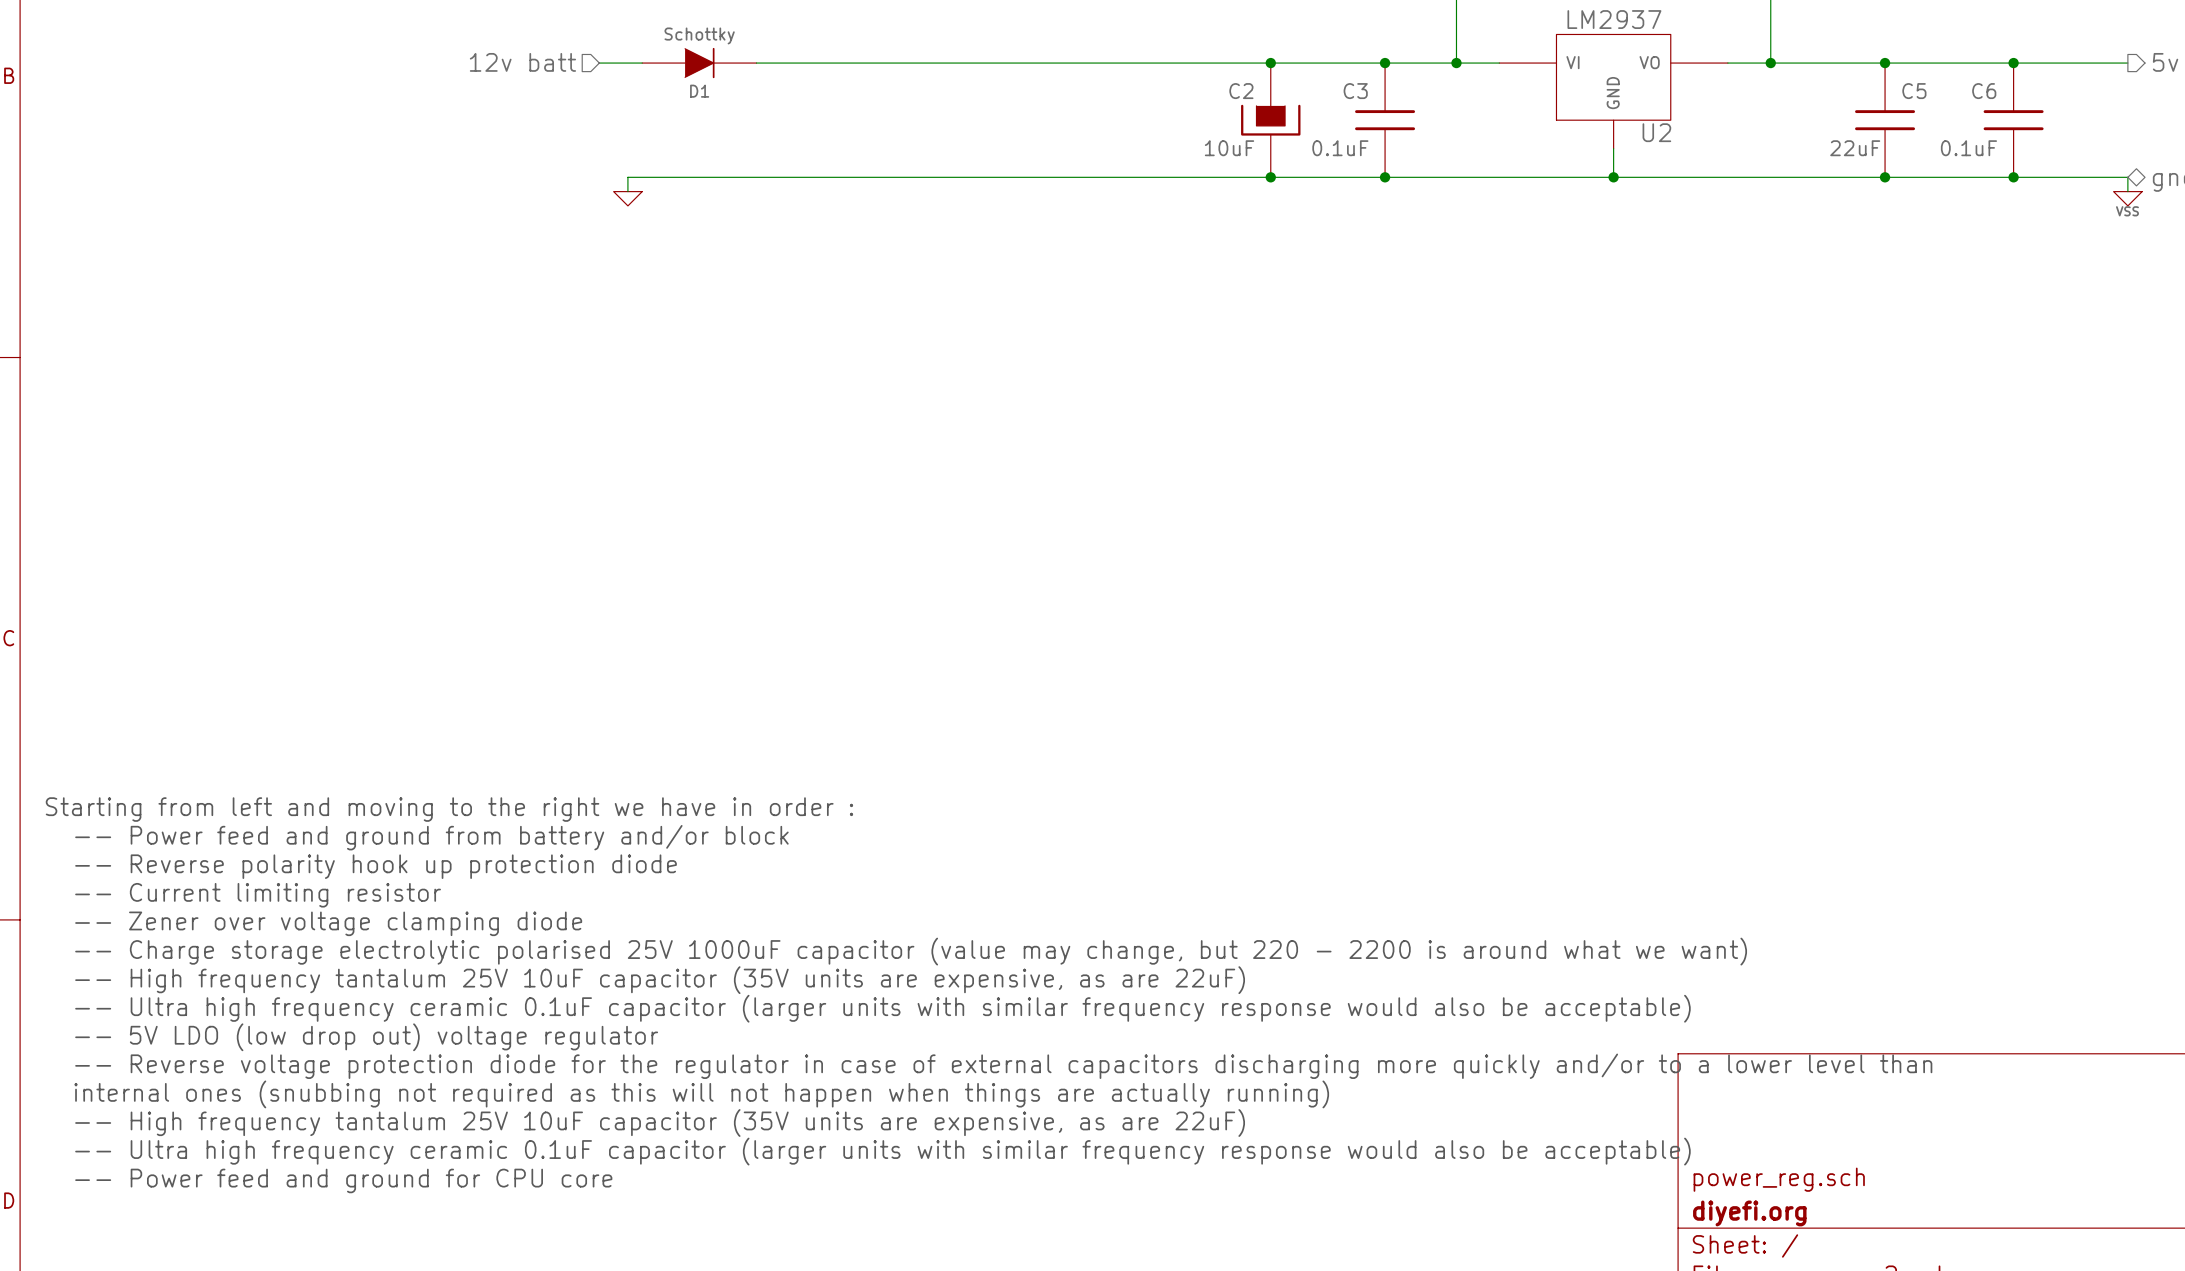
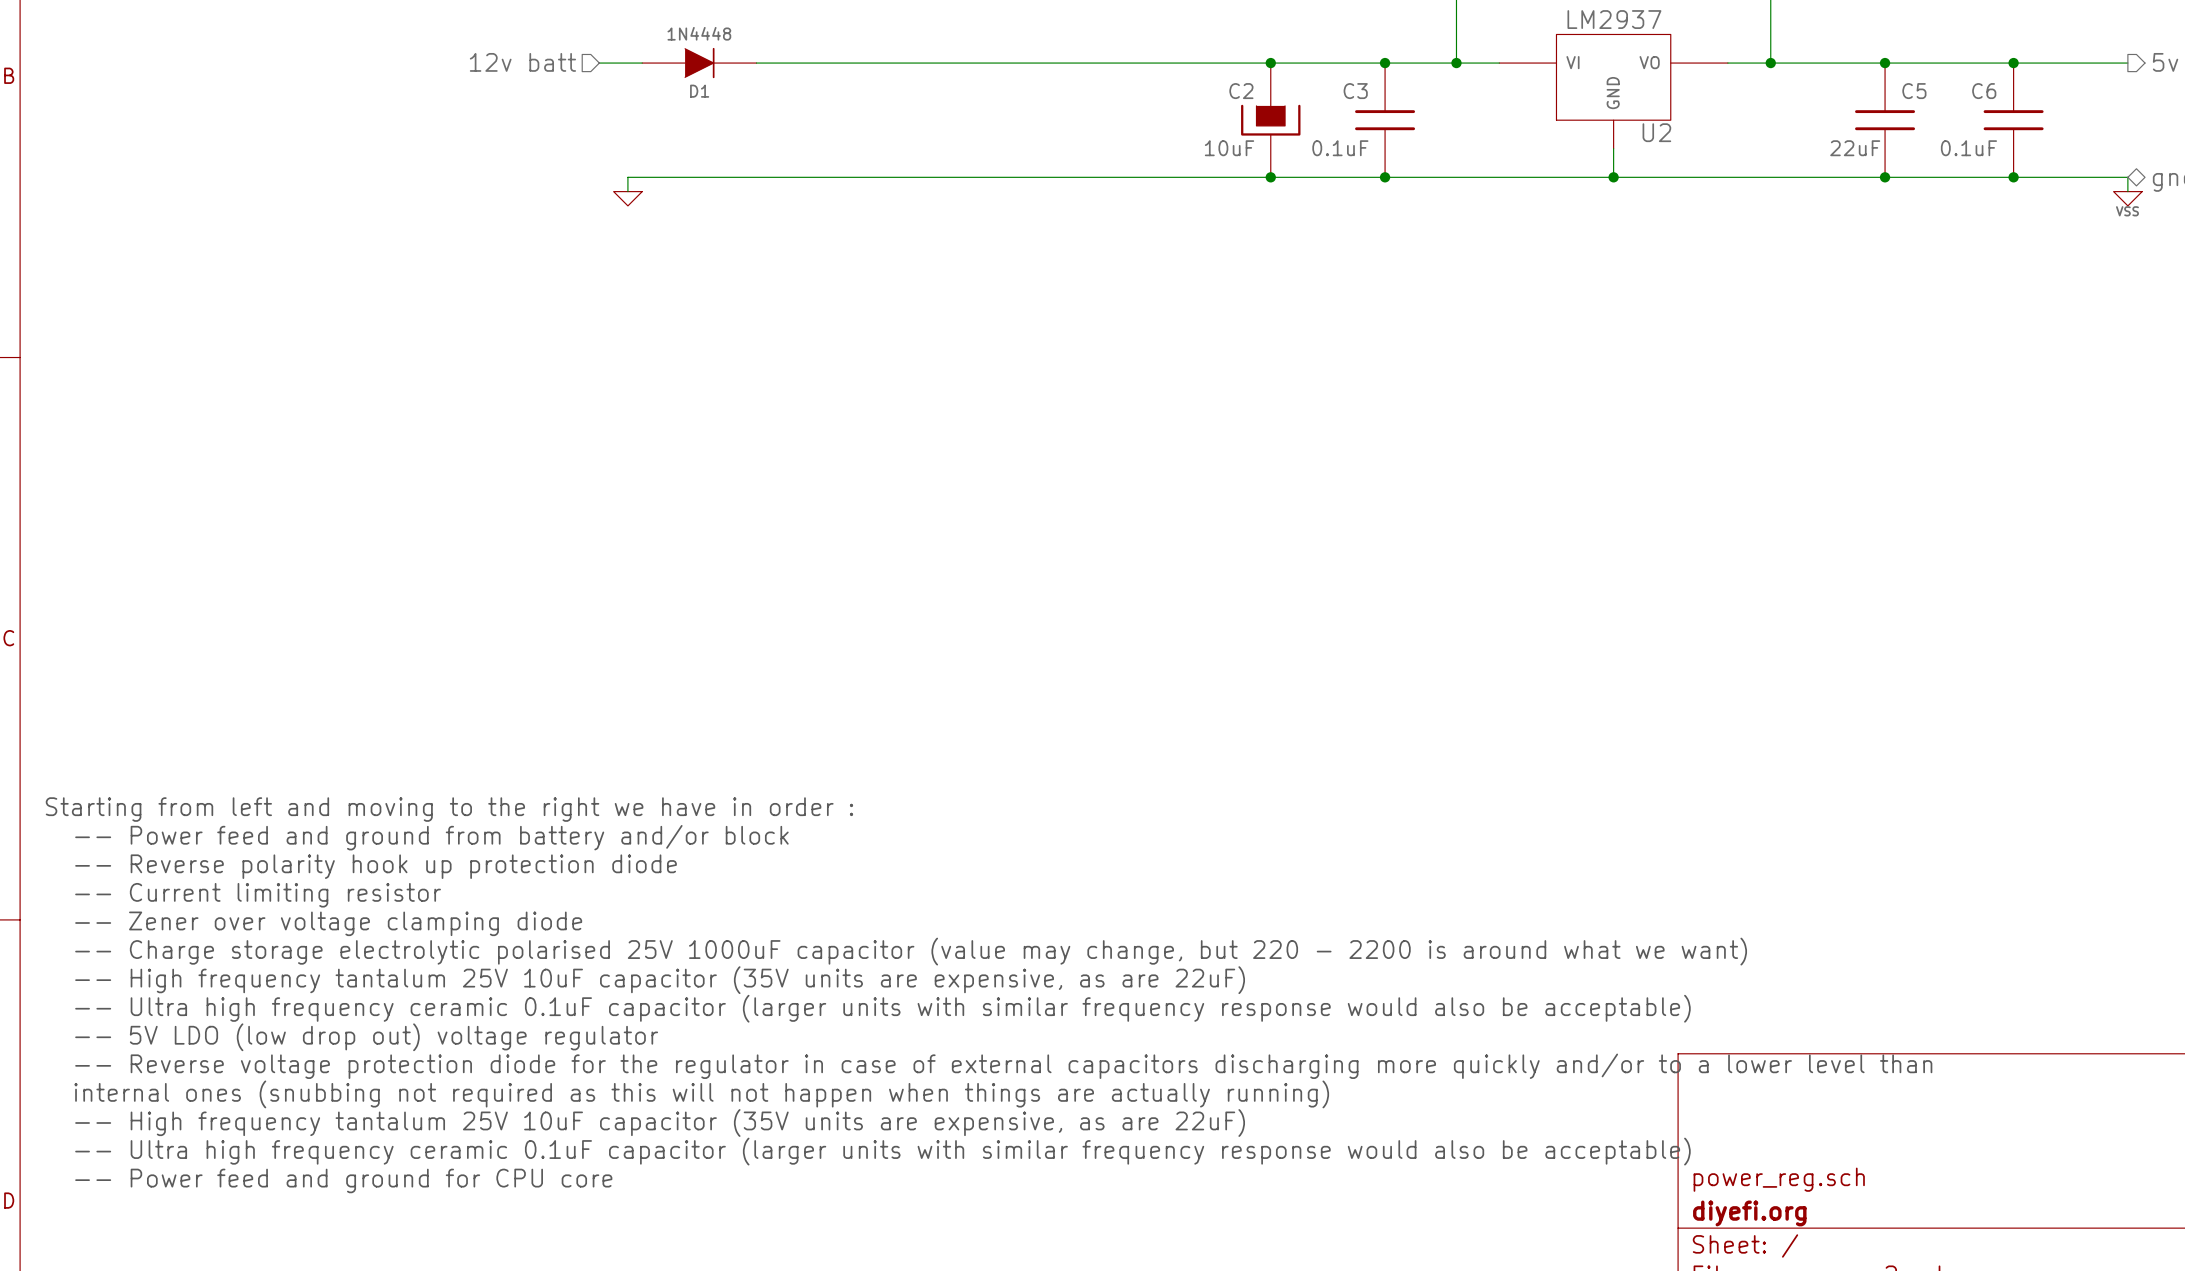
D1 value: Schottky (699, 35) -> 1N4448 (699, 33)

